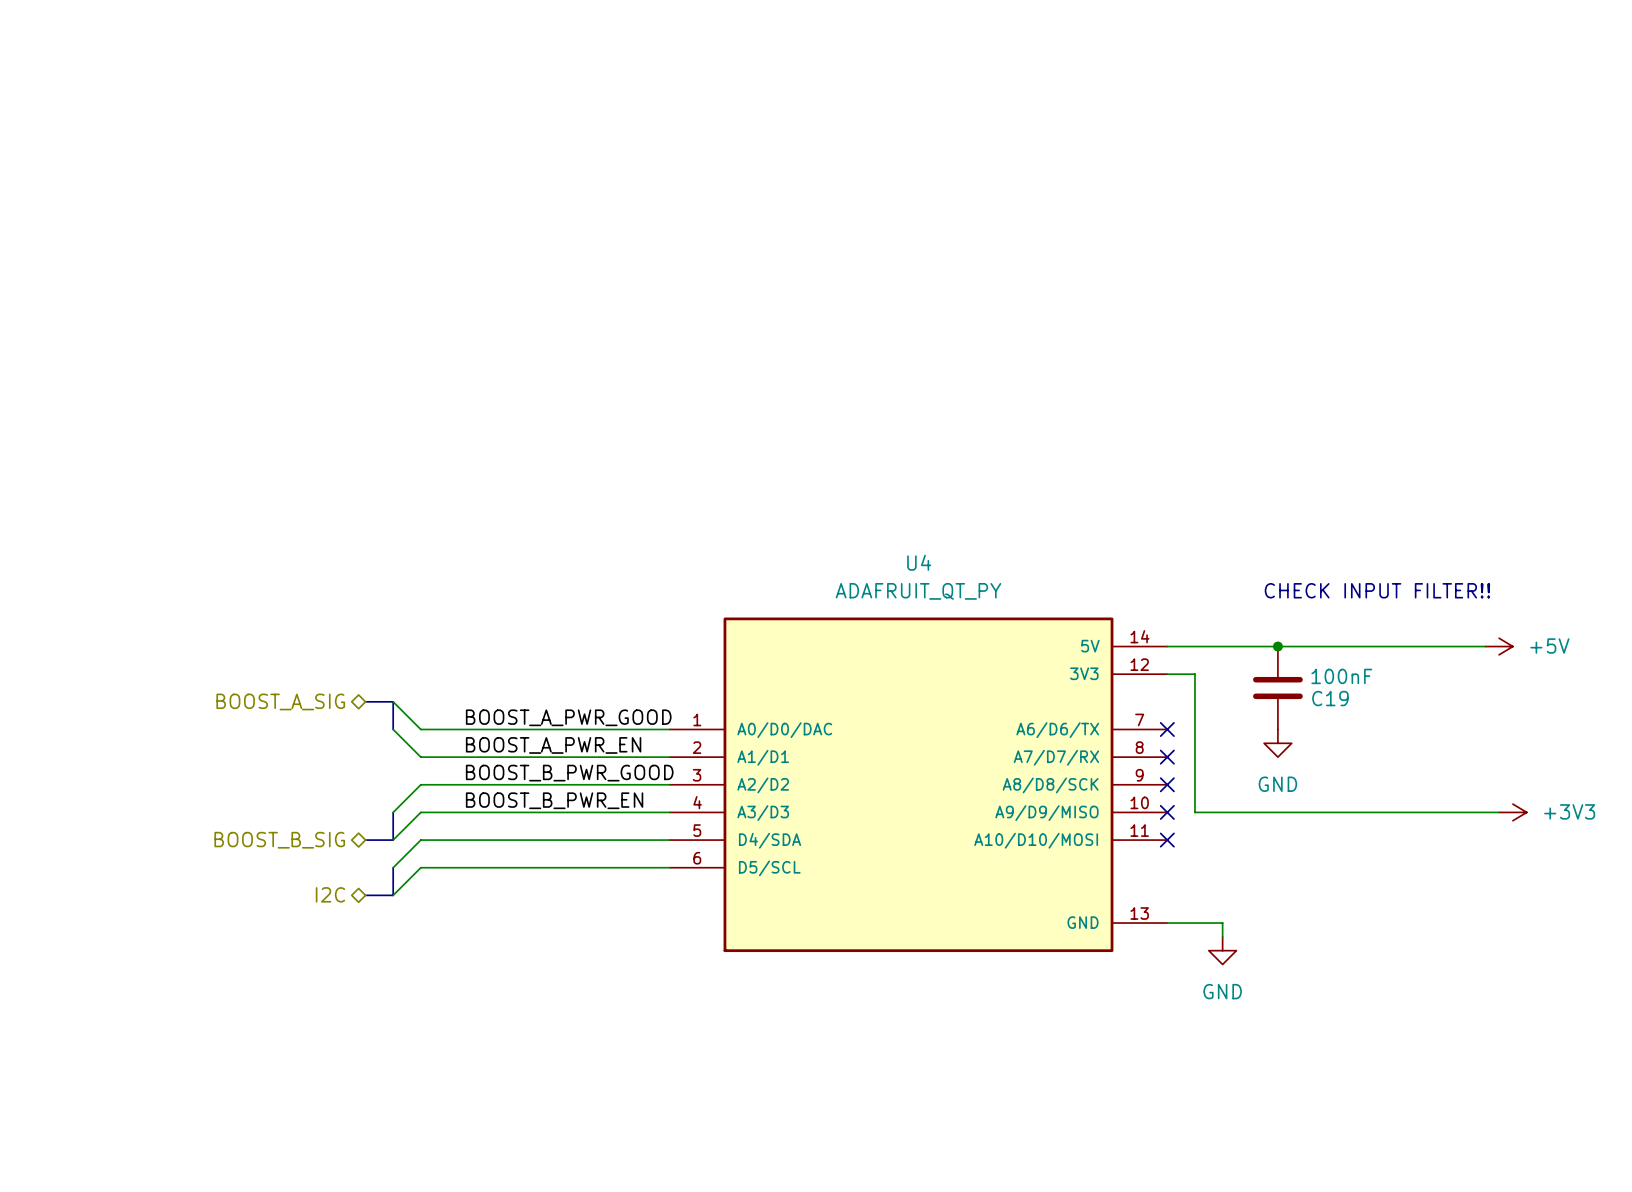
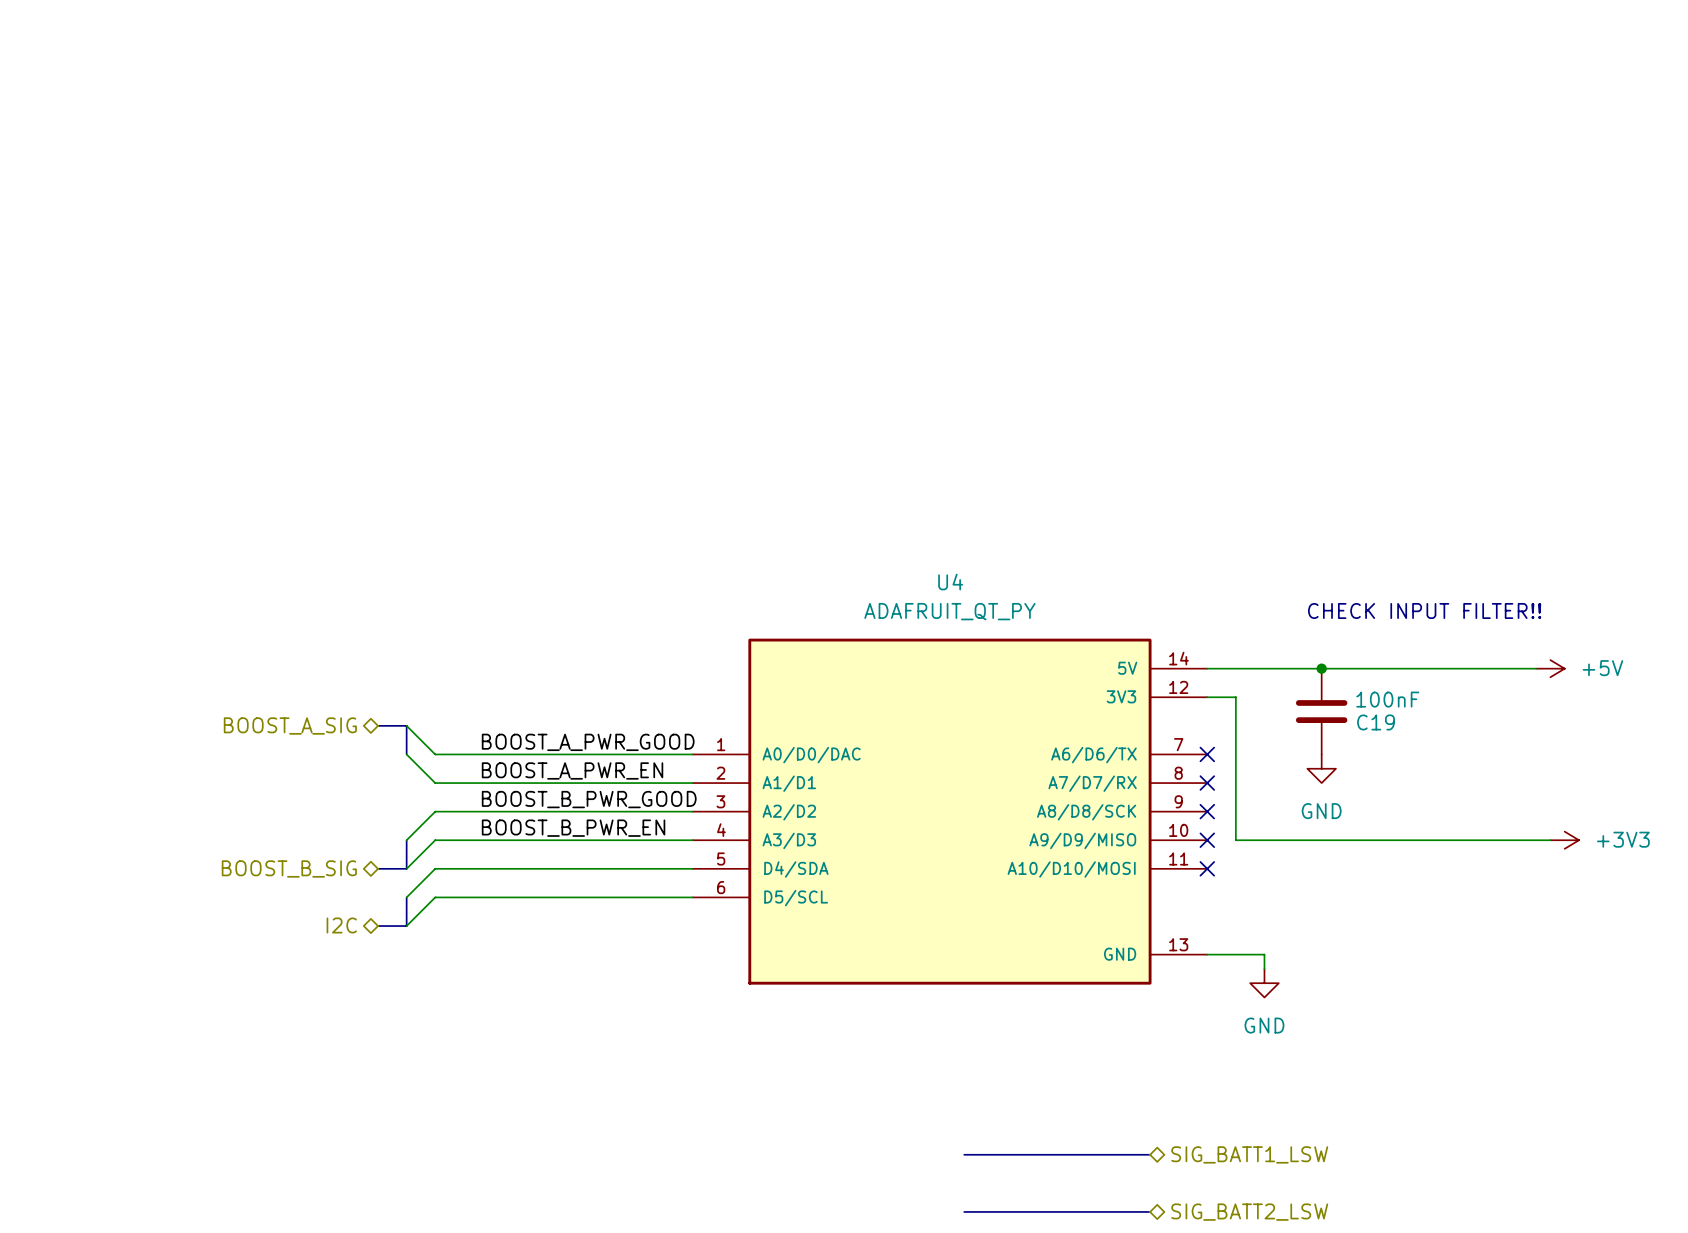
bus: none -> (964, 1154) (1150, 1154)
hierarchical label: none -> SIG_BATT1_LSW (1249, 1154)
bus: none -> (964, 1211) (1150, 1211)
hierarchical label: none -> SIG_BATT2_LSW (1249, 1212)

